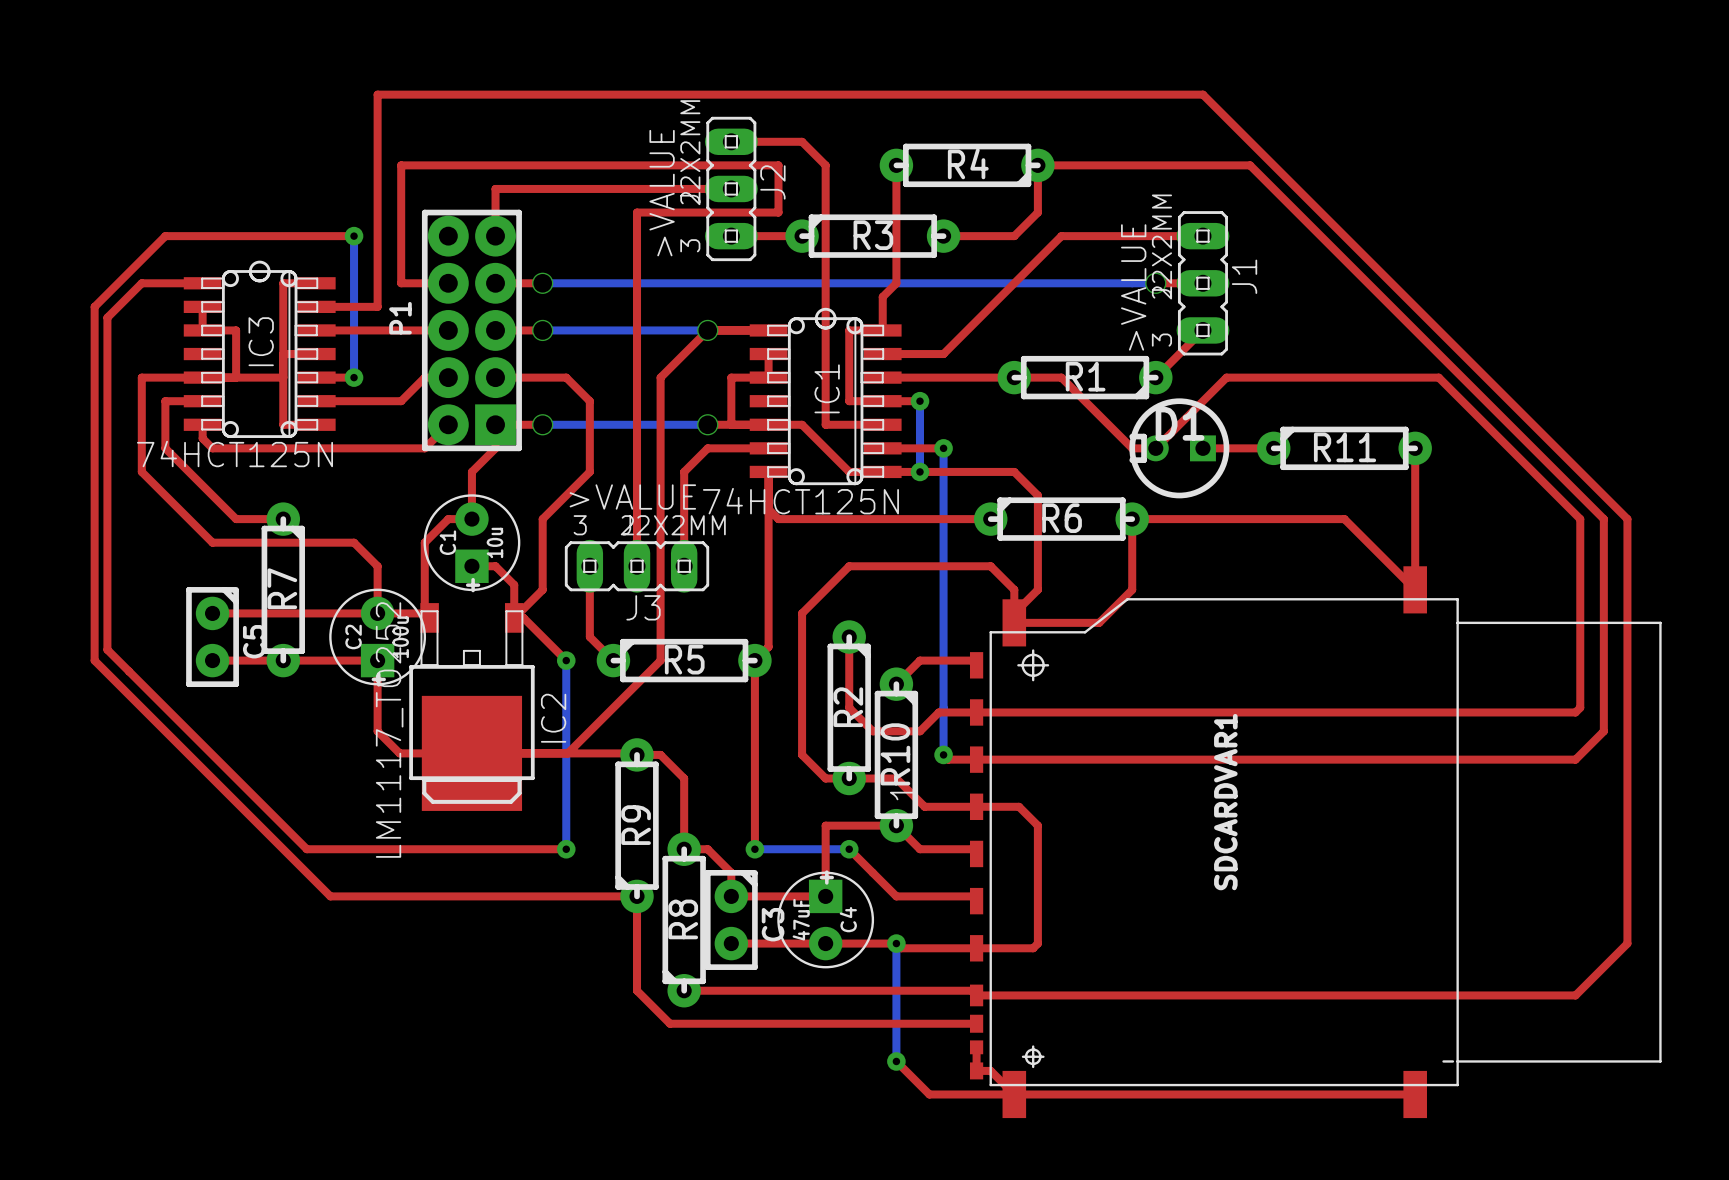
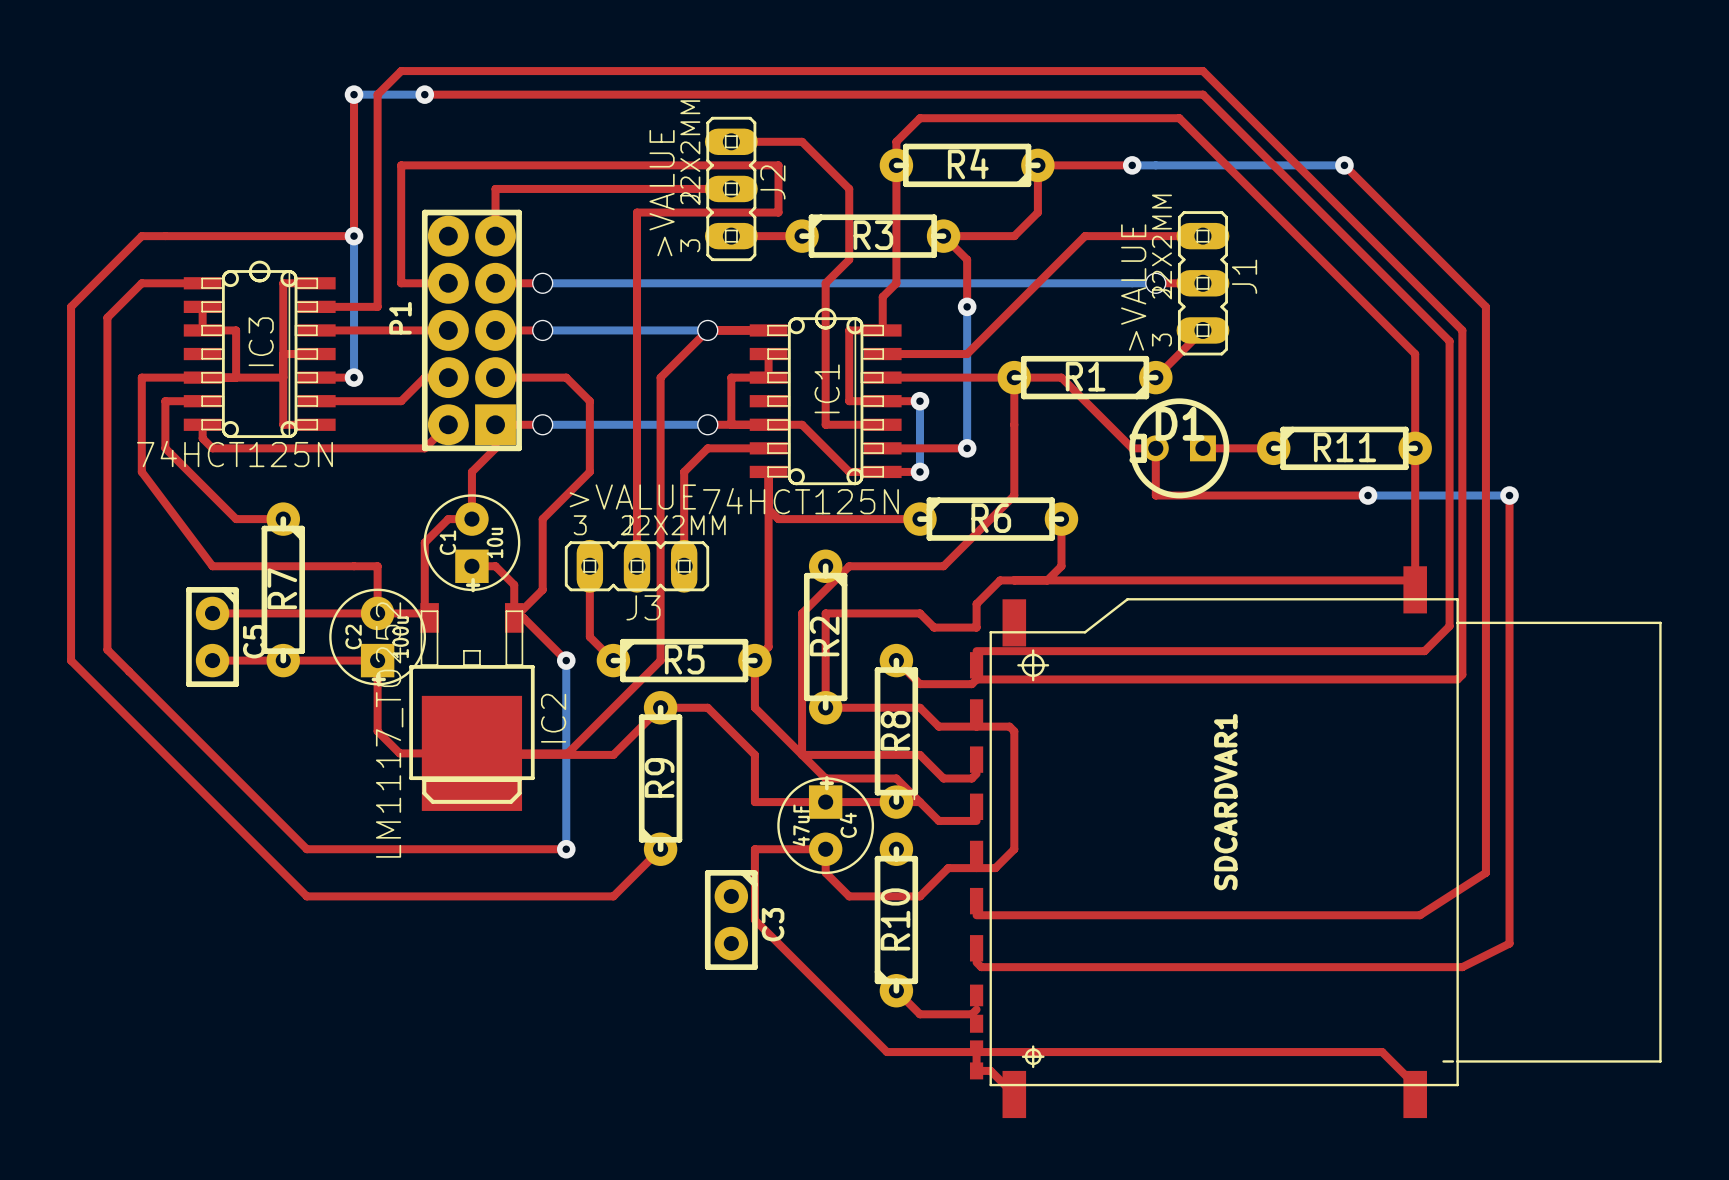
top track: none -> (354, 94) (354, 236)
bottom track: none -> (354, 94) (424, 94)
via: none -> (354, 94)
top track: (377, 94) (424, 94) -> (377, 94) (401, 71) (1202, 71) (1462, 330) (1462, 674) (1457, 679) (976, 679) (971, 684) (919, 684) (896, 660)
via: none -> (424, 94)
top track: (825, 165) (825, 283) -> (825, 165) (849, 188) (849, 259) (825, 283)
top track: none -> (896, 165) (896, 141) (919, 118) (1179, 118) (1415, 354) (1415, 448)
top track: (1132, 165) (1250, 165) (1603, 519) (1603, 731) (1575, 759) (948, 759) (943, 754) -> none
bottom track: none -> (1132, 165) (1344, 165)
via: none -> (1132, 165)
top track: none -> (1344, 165) (1485, 306) (1485, 872) (1419, 915) (976, 915)
via: none -> (1344, 165)
top track: (165, 236) (94, 306) (94, 660) (330, 896) -> (165, 236) (141, 236) (71, 306) (71, 660) (306, 896) (330, 896)
top track: none -> (943, 236) (967, 259) (967, 306)
top track: (1085, 236) (1061, 236) (943, 354) -> (1085, 236) (967, 354) (943, 354)
bottom track: none -> (967, 306) (967, 448)
via: none -> (967, 306)
top track: (1449, 341) (1627, 519) (1627, 943) (1575, 995) (976, 995) (971, 990) (684, 990) -> (1449, 341) (1449, 626) (1424, 651) (976, 651)
top track: none -> (1014, 377) (1014, 495) (943, 566)
top track: none -> (943, 448) (967, 448)
bottom track: (943, 448) (943, 754) -> none
via position: (943, 448) -> (967, 448)
top track: (1155, 448) (1226, 377) (1438, 377) (1580, 519) (1580, 707) (1575, 712) (938, 712) (919, 731) (872, 731) (849, 707) (849, 637) -> (1155, 448) (1155, 495) (1368, 495)
top track: (141, 471) (212, 542) (354, 542) (377, 566) -> (141, 471) (212, 566) (377, 566)
top track: (919, 471) (1014, 471) (1037, 495) (1037, 589) (1014, 613) -> none
bottom track: none -> (1368, 495) (1509, 495)
via: none -> (1368, 495)
top track: none -> (1509, 495) (1509, 943) (1462, 967) (981, 967) (976, 962)
via: none -> (1509, 495)
top track: (919, 519) (990, 519) -> none
top track: none -> (1061, 519) (1061, 566) (1047, 580)
R6 position: (1061, 519) -> (990, 519)
top track: (943, 566) (990, 566) (1014, 589) (1014, 622) (1099, 622) (1132, 589) (1132, 519) (1344, 519) (1415, 589) (1415, 580) -> (919, 896) (948, 868) (995, 868) (1014, 849) (1014, 731) (1009, 726) (938, 726) (919, 707) (825, 707) (825, 613) (919, 613) (934, 627) (976, 627) (976, 603) (1000, 580) (1415, 580)
top track: (976, 665) (971, 660) (919, 660) (896, 684) -> none
top track: (754, 707) (754, 754) -> (754, 707) (802, 754) (919, 754) (943, 778) (971, 778) (976, 773)
R2 position: (849, 707) -> (825, 637)
top track: none -> (471, 753) (613, 754) (660, 707) (707, 707) (754, 754)
top track: (567, 753) (660, 754) (684, 778) (684, 849) (707, 849) (731, 872) (731, 896) (825, 896) (825, 872) -> none
R10 rotation: 0° (896, 754) -> 180° (896, 919)
R10 position: (896, 754) -> (896, 919)
via: (943, 754) -> none
top track: (754, 802) (754, 849) -> (754, 802) (919, 802)
top track: (924, 806) (1019, 806) (1037, 825) (1037, 943) (1033, 948) (901, 948) (896, 943) (731, 943) -> (924, 806) (938, 820) (976, 820)
R9 position: (637, 825) -> (660, 778)
bottom track: (754, 849) (849, 849) -> none
via: (754, 849) -> none
top track: (825, 849) (825, 825) (896, 825) (919, 849) (971, 849) (976, 853) -> (825, 849) (754, 849) (754, 919) (886, 1052) (1382, 1052) (1415, 1085)
top track: (849, 849) (896, 896) -> (825, 872) (849, 896) (896, 896)
via: (849, 849) -> none
top track: (613, 896) (637, 896) (637, 990) (670, 1023) (976, 1023) -> (613, 896) (660, 849)
top track: (919, 896) (971, 896) (976, 901) -> none
R8 rotation: 0° (684, 919) -> 180° (896, 731)
R8 position: (684, 919) -> (896, 731)
C4 position: (825, 919) -> (825, 825)
bottom track: (896, 943) (896, 1061) -> none
via: (896, 943) -> none
top track: none -> (896, 990) (919, 1014) (971, 1014) (976, 1009)
top track: (896, 1061) (929, 1094) (1415, 1094) -> none
via: (896, 1061) -> none

